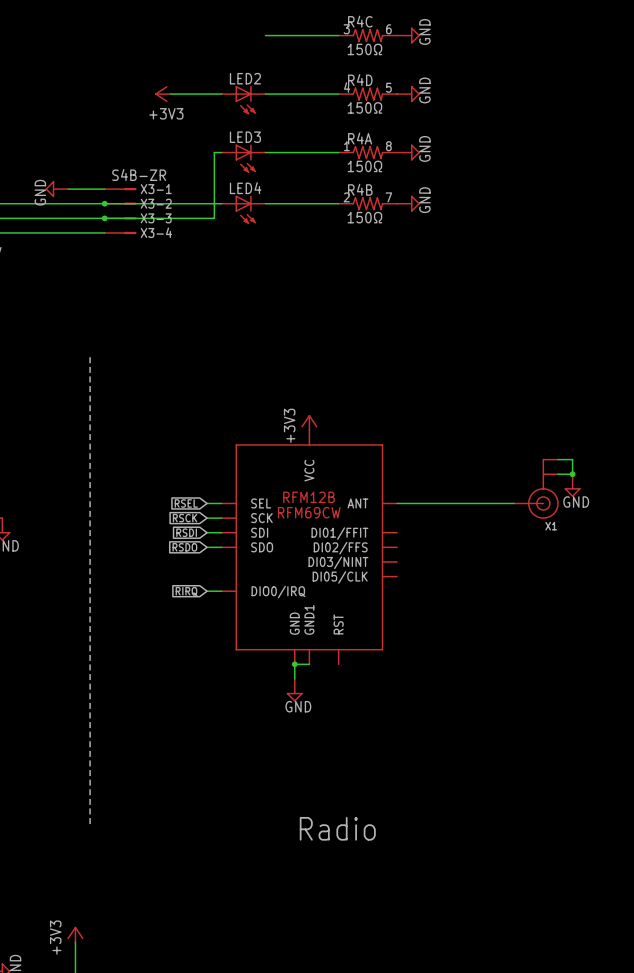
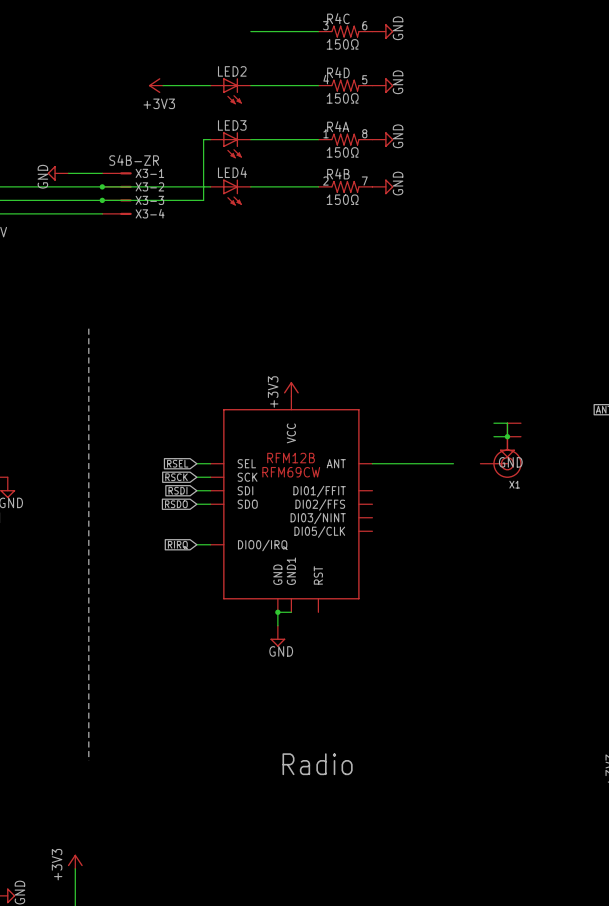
wire: (557, 459) (572, 459) (572, 474) (557, 474) -> (493, 423) (507, 423) (507, 436) (493, 436)
junction position: (572, 474) -> (507, 436)
power symbol position: GND (572, 485) -> GND (507, 447)
wire: (484, 503) (514, 503) -> none

